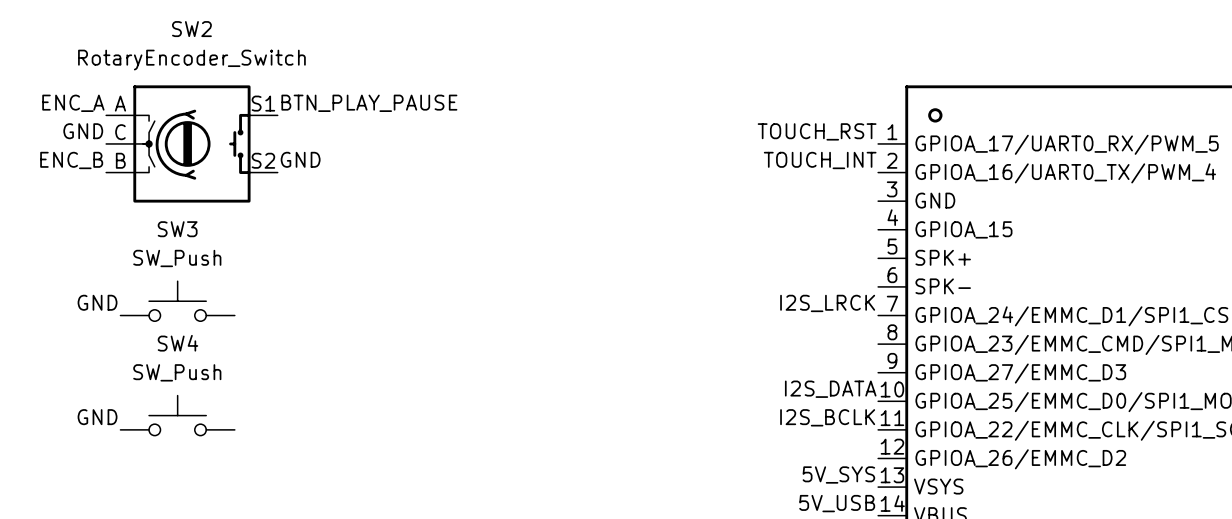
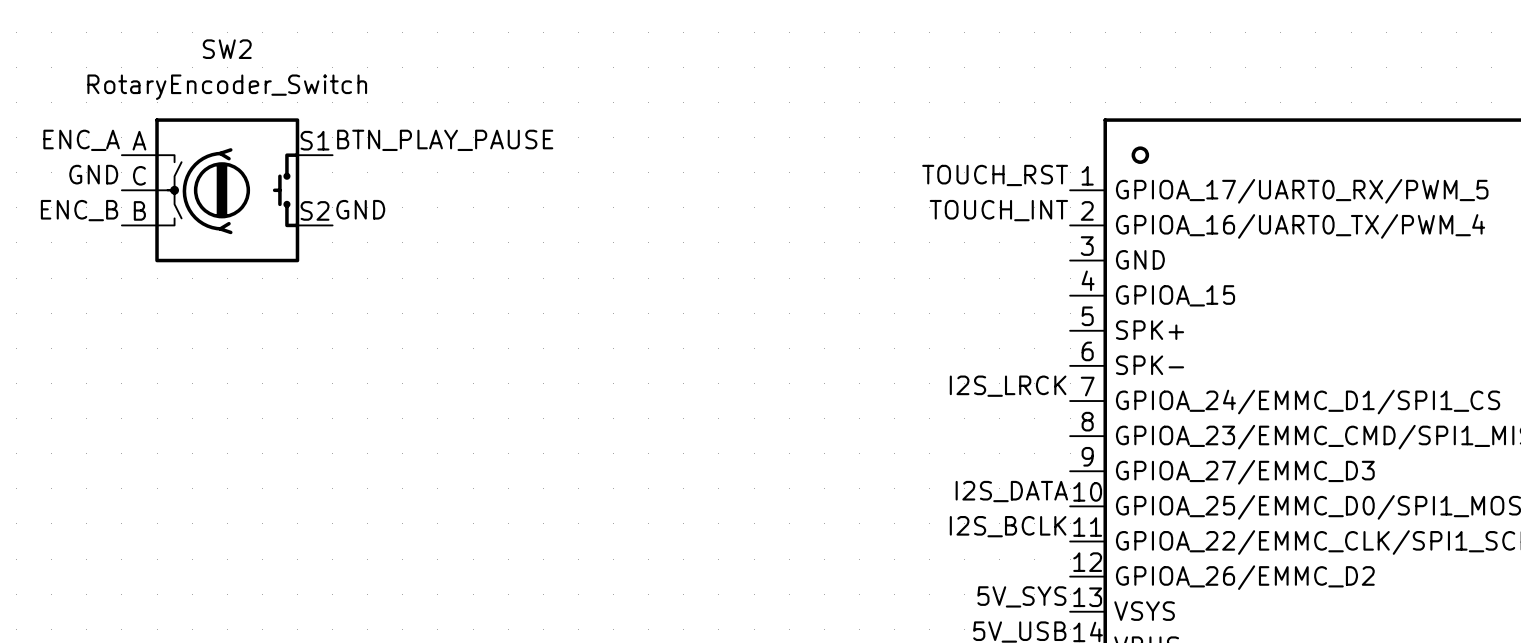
SW3: SW_Push (177, 301) -> none
label: GND (97, 302) -> none
SW4: SW_Push (177, 415) -> none
label: GND (97, 417) -> none

